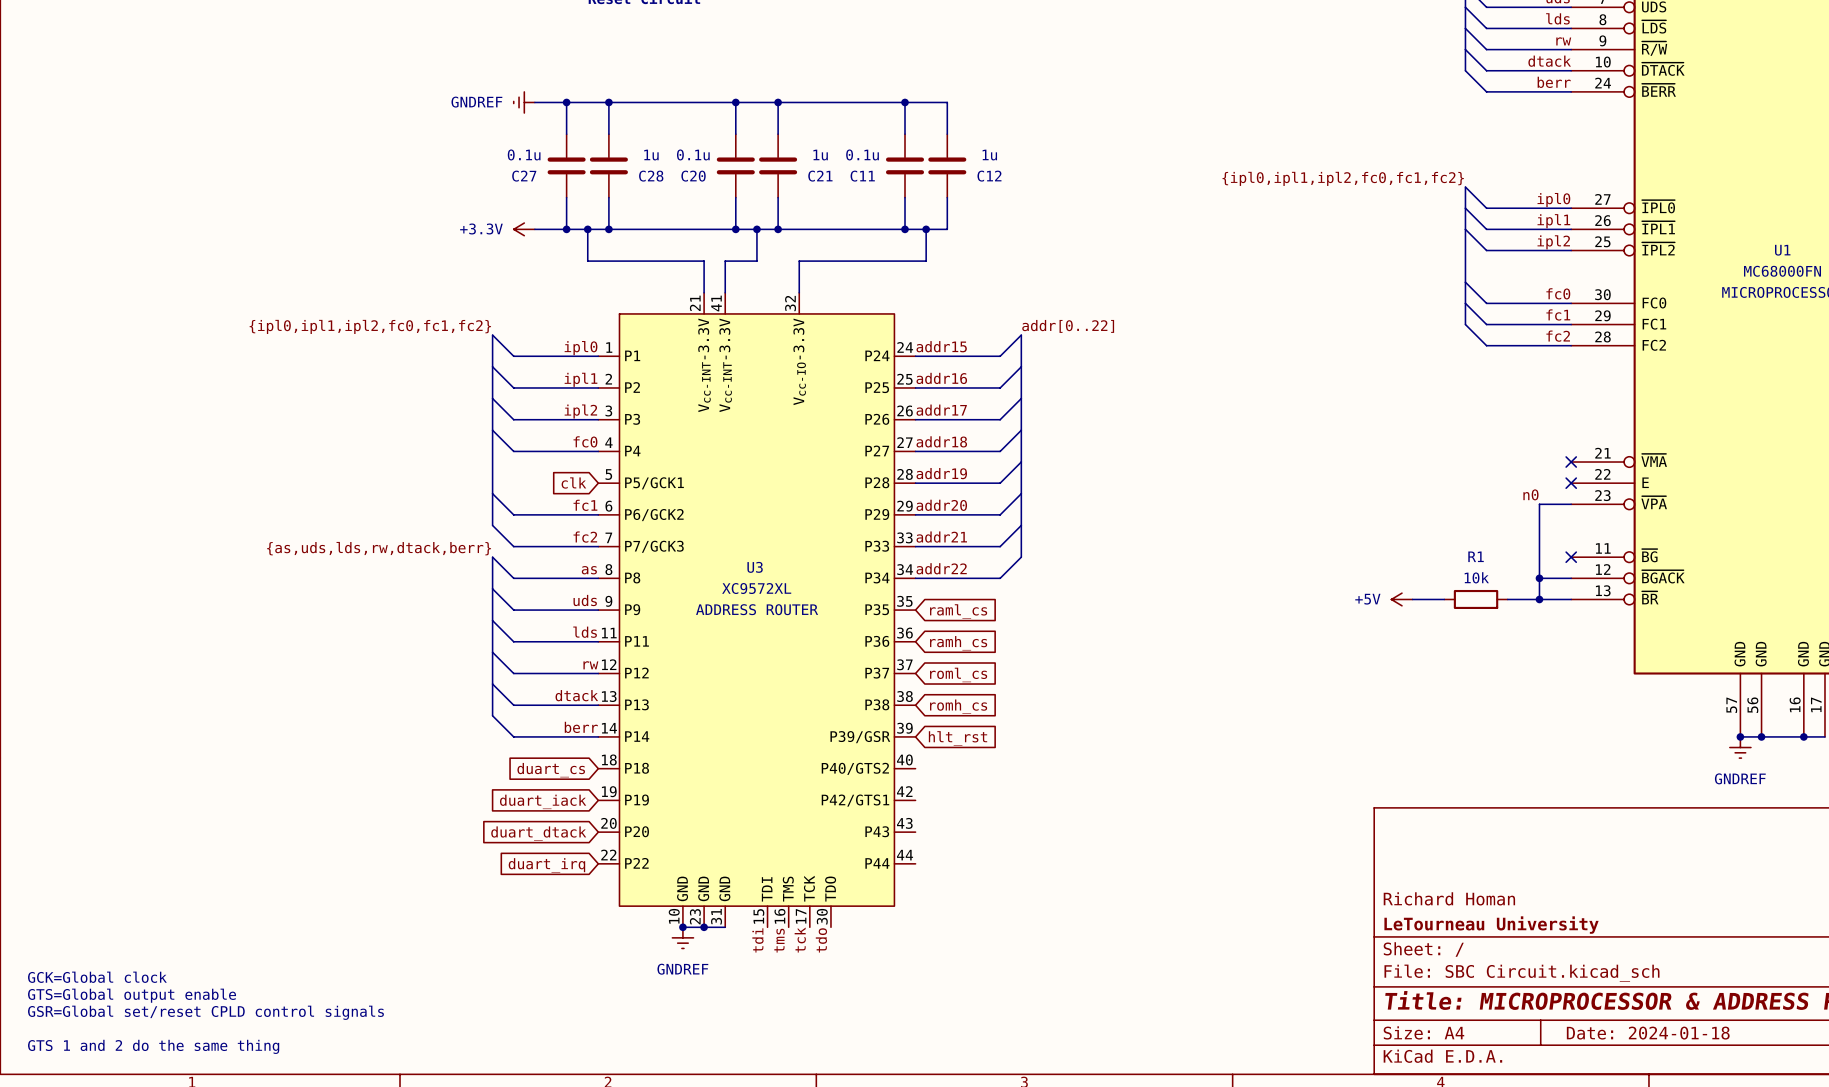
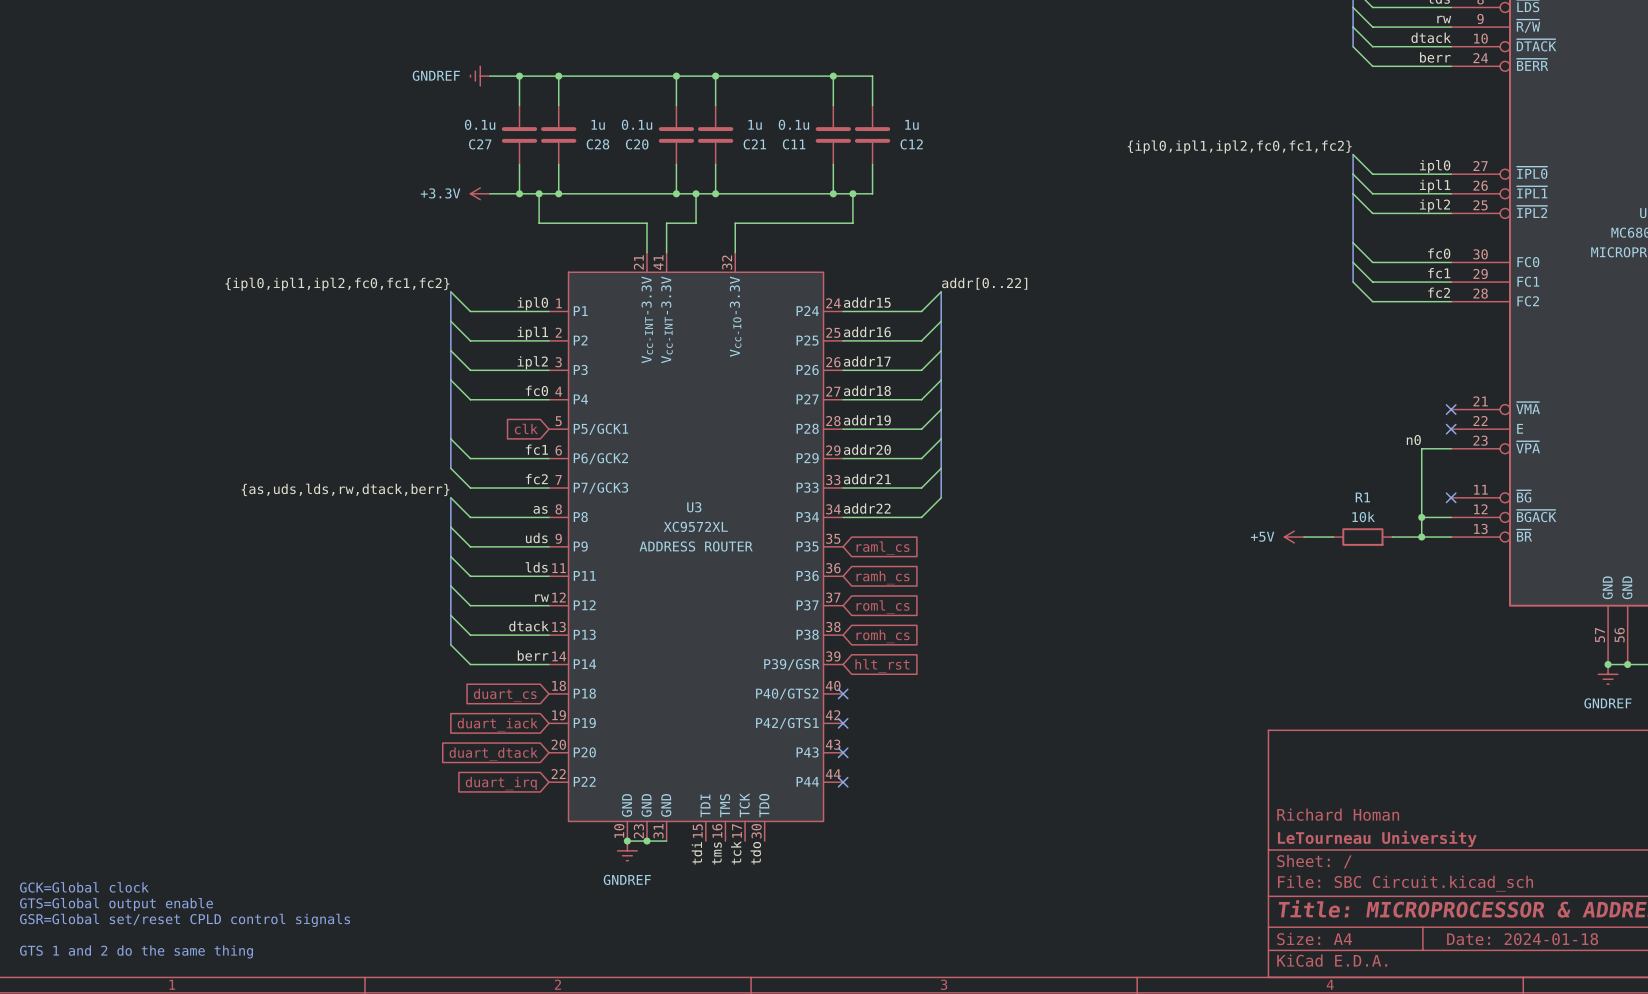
no-connect mark: none -> (843, 693)
no-connect mark: none -> (843, 723)
no-connect mark: none -> (843, 752)
no-connect mark: none -> (843, 782)

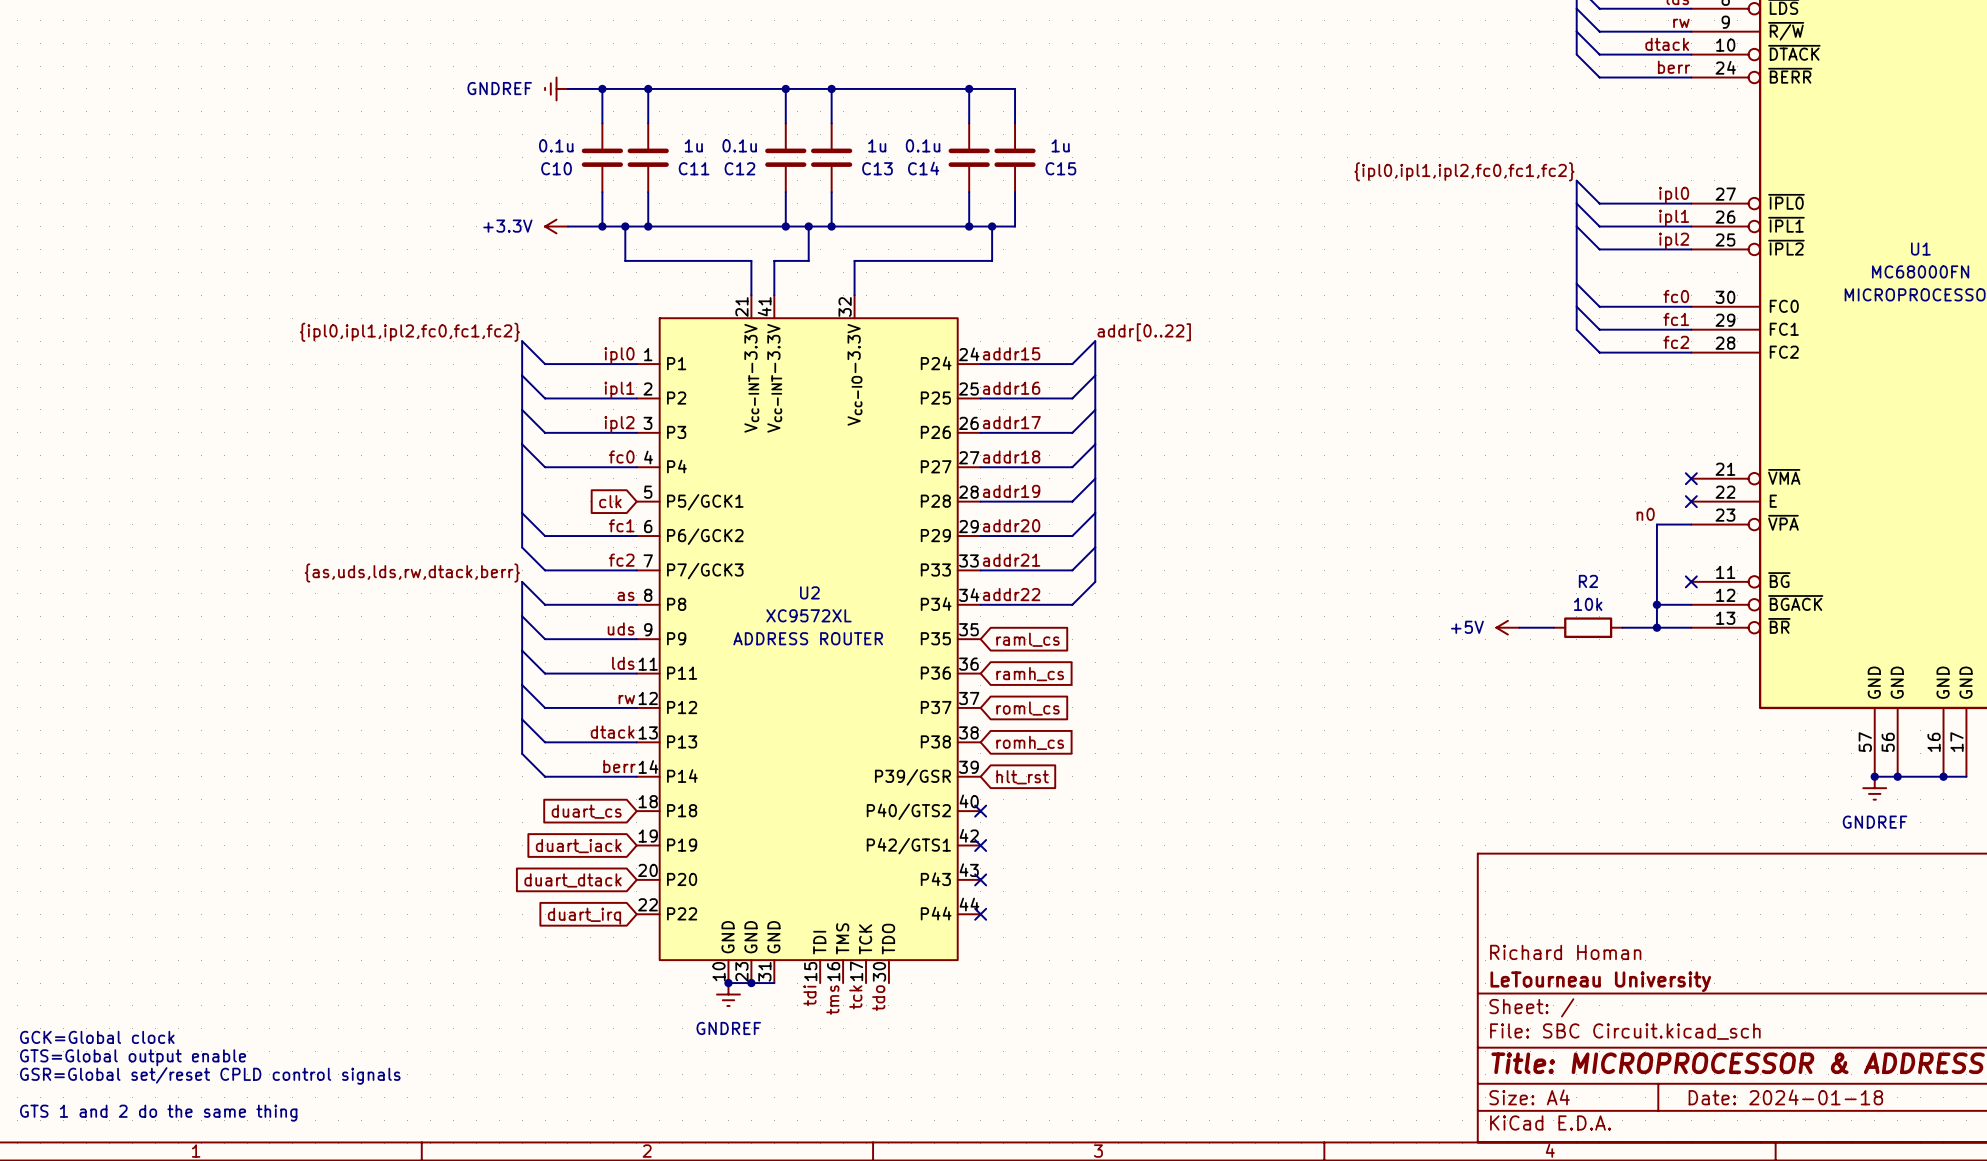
C27 name: C27 (480, 144) -> C10 (556, 168)
C28 name: C28 (597, 144) -> C11 (694, 168)
C20 name: C20 (637, 144) -> C12 (739, 168)
C21 name: C21 (754, 144) -> C13 (877, 168)
C11 name: C11 (794, 144) -> C14 (923, 168)
C12 name: C12 (911, 144) -> C15 (1060, 168)
R1 name: R1 (1362, 497) -> R2 (1588, 581)
U3 name: U3 (694, 507) -> U2 (809, 592)

